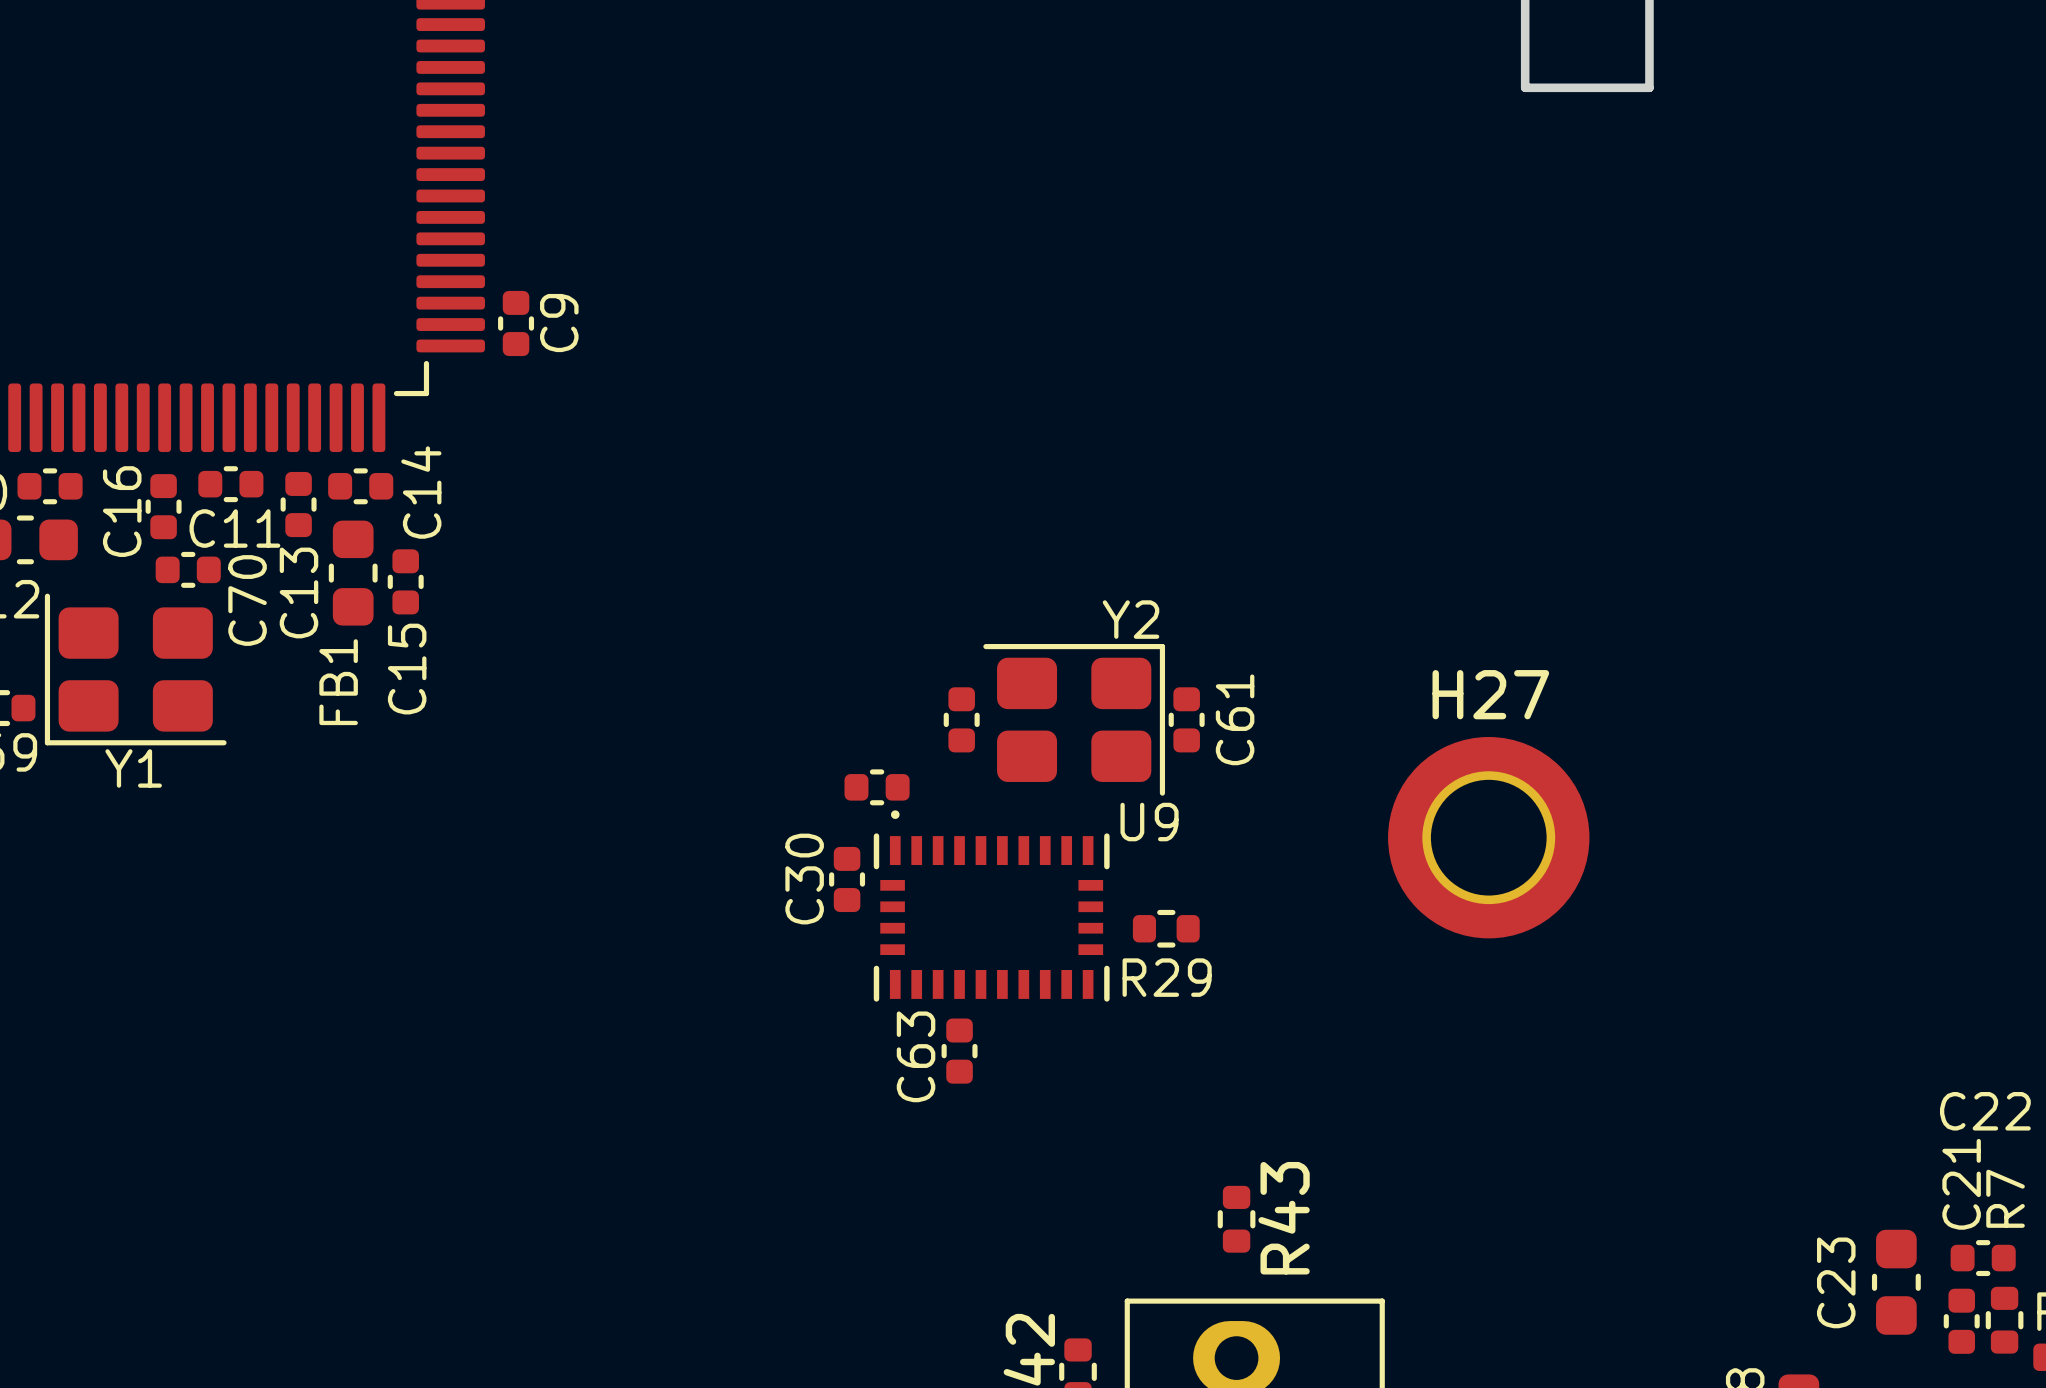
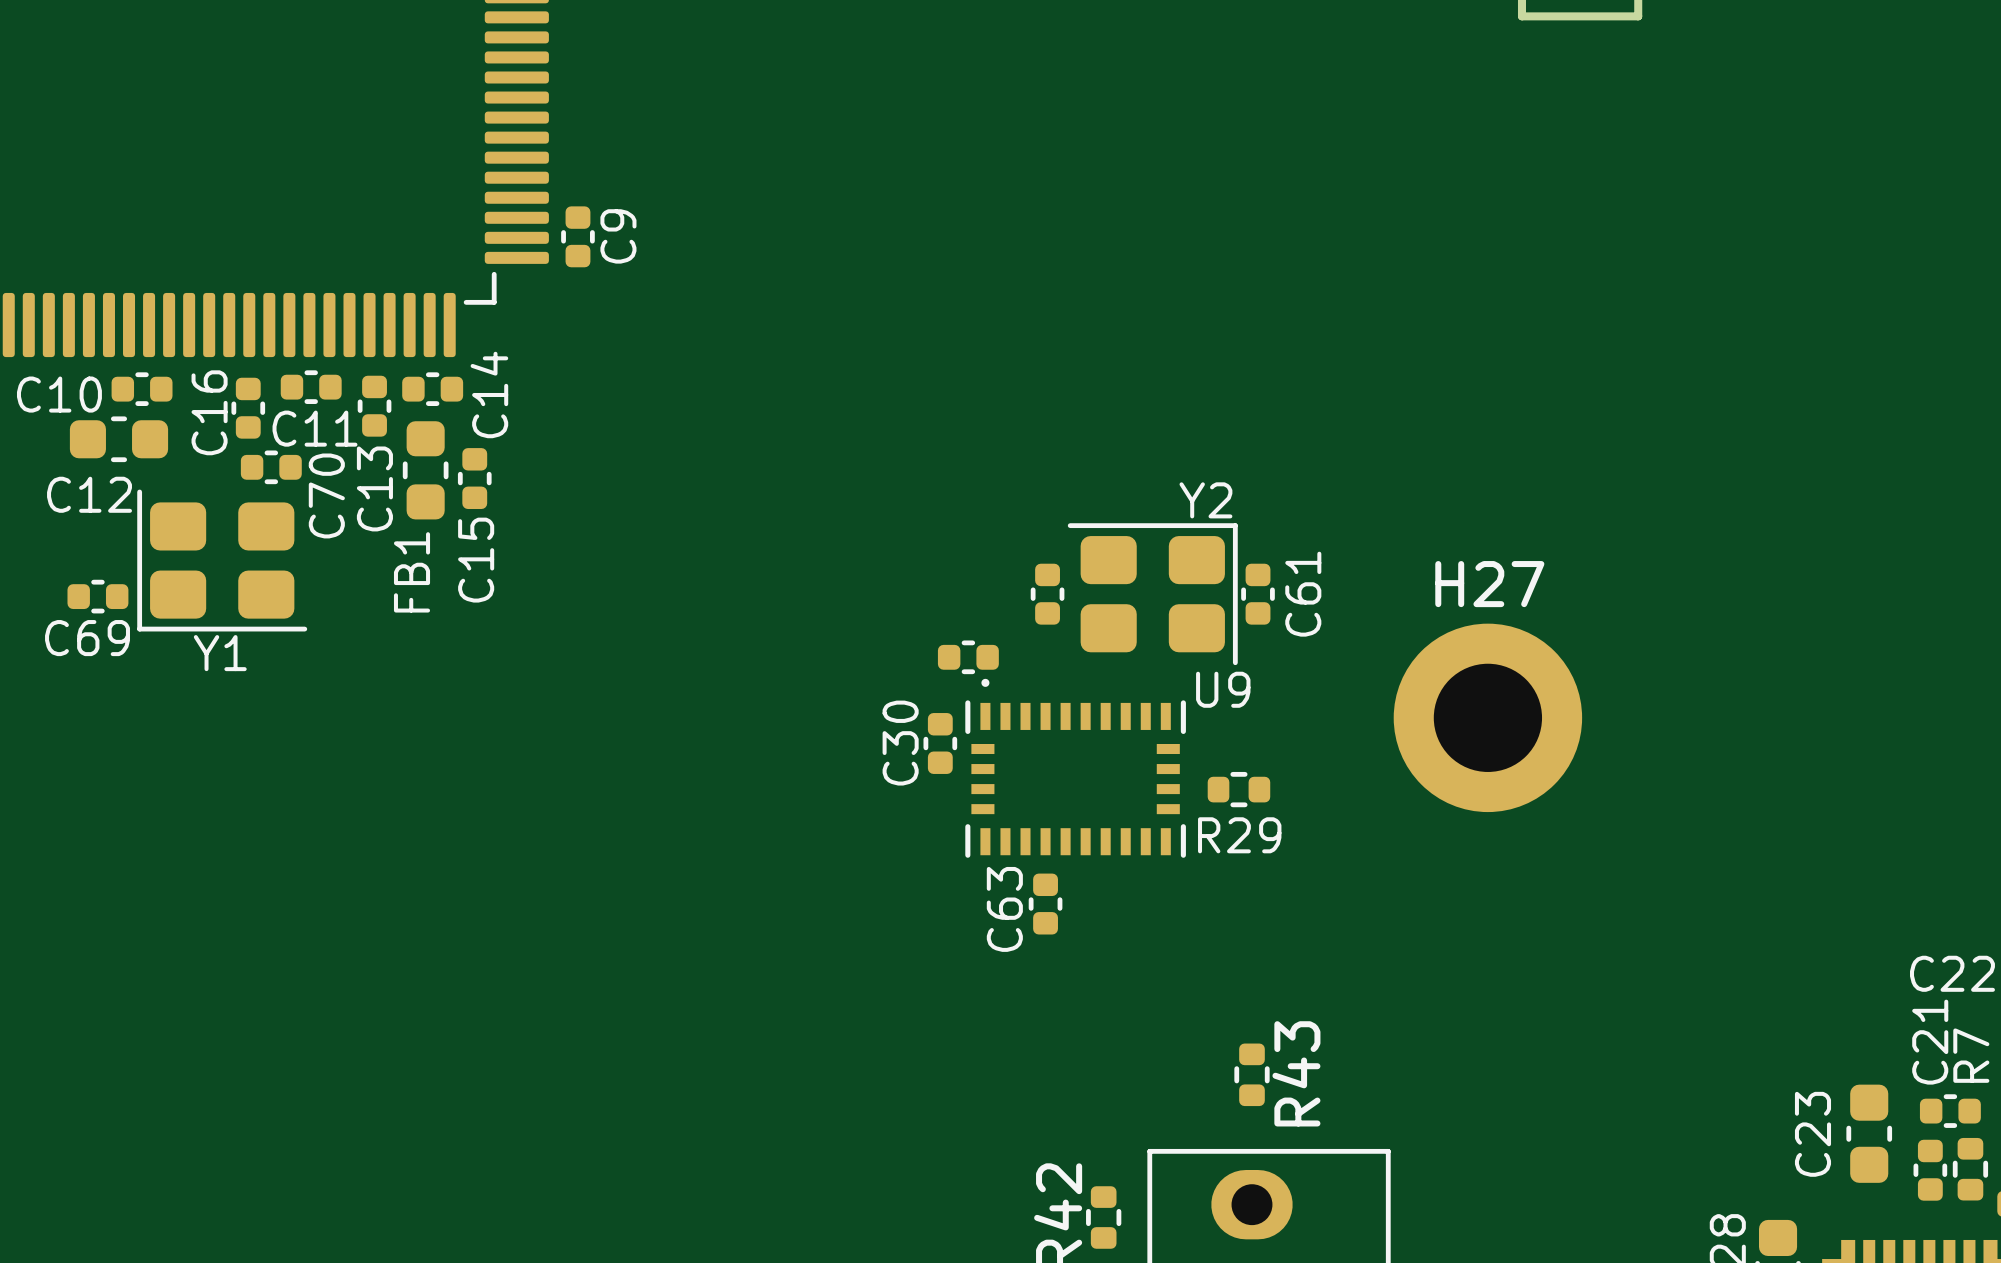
part: none -> (1047, 594)
part: (961, 719) -> none
Y2 position: (1074, 719) -> (1152, 594)
C61 position: (1186, 719) -> (1258, 594)
part: none -> (968, 657)
part: (877, 787) -> none
C30 position: (847, 879) -> (940, 743)
U9 position: (991, 906) -> (1075, 768)
R29 position: (1166, 928) -> (1238, 789)
C63 position: (959, 1051) -> (1045, 904)

